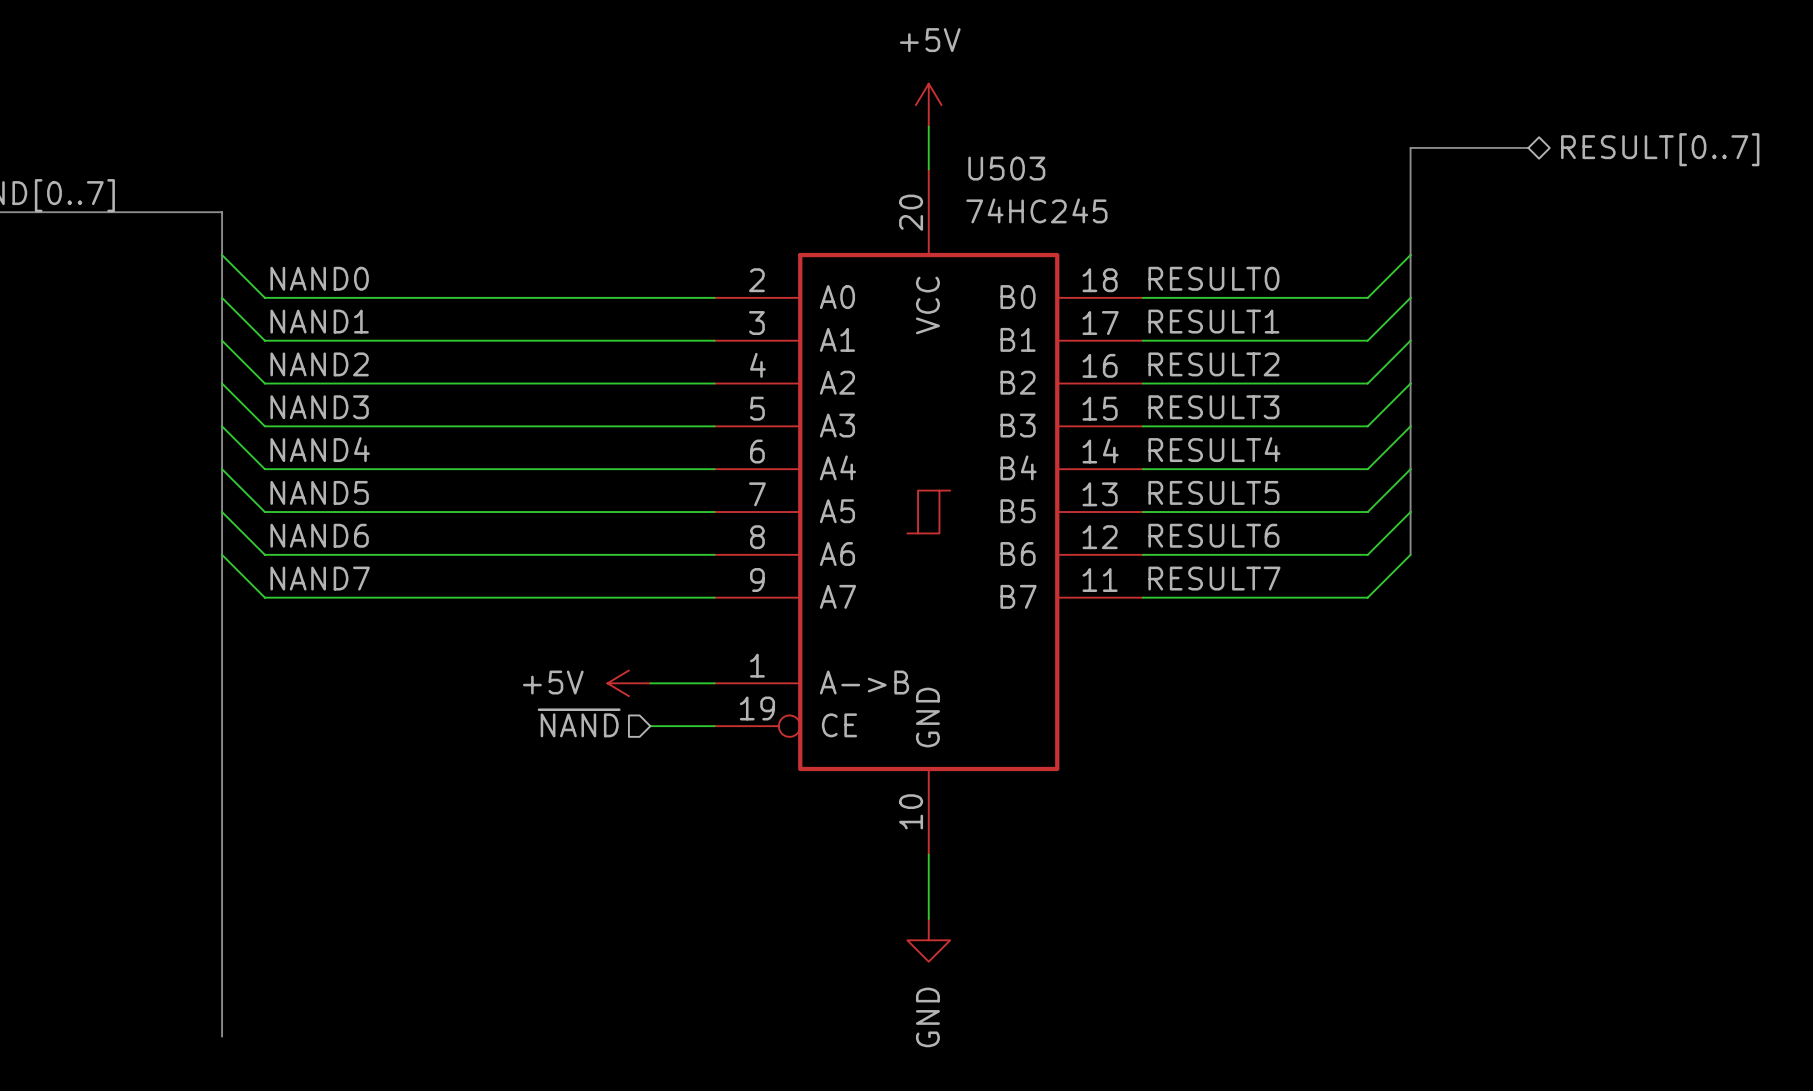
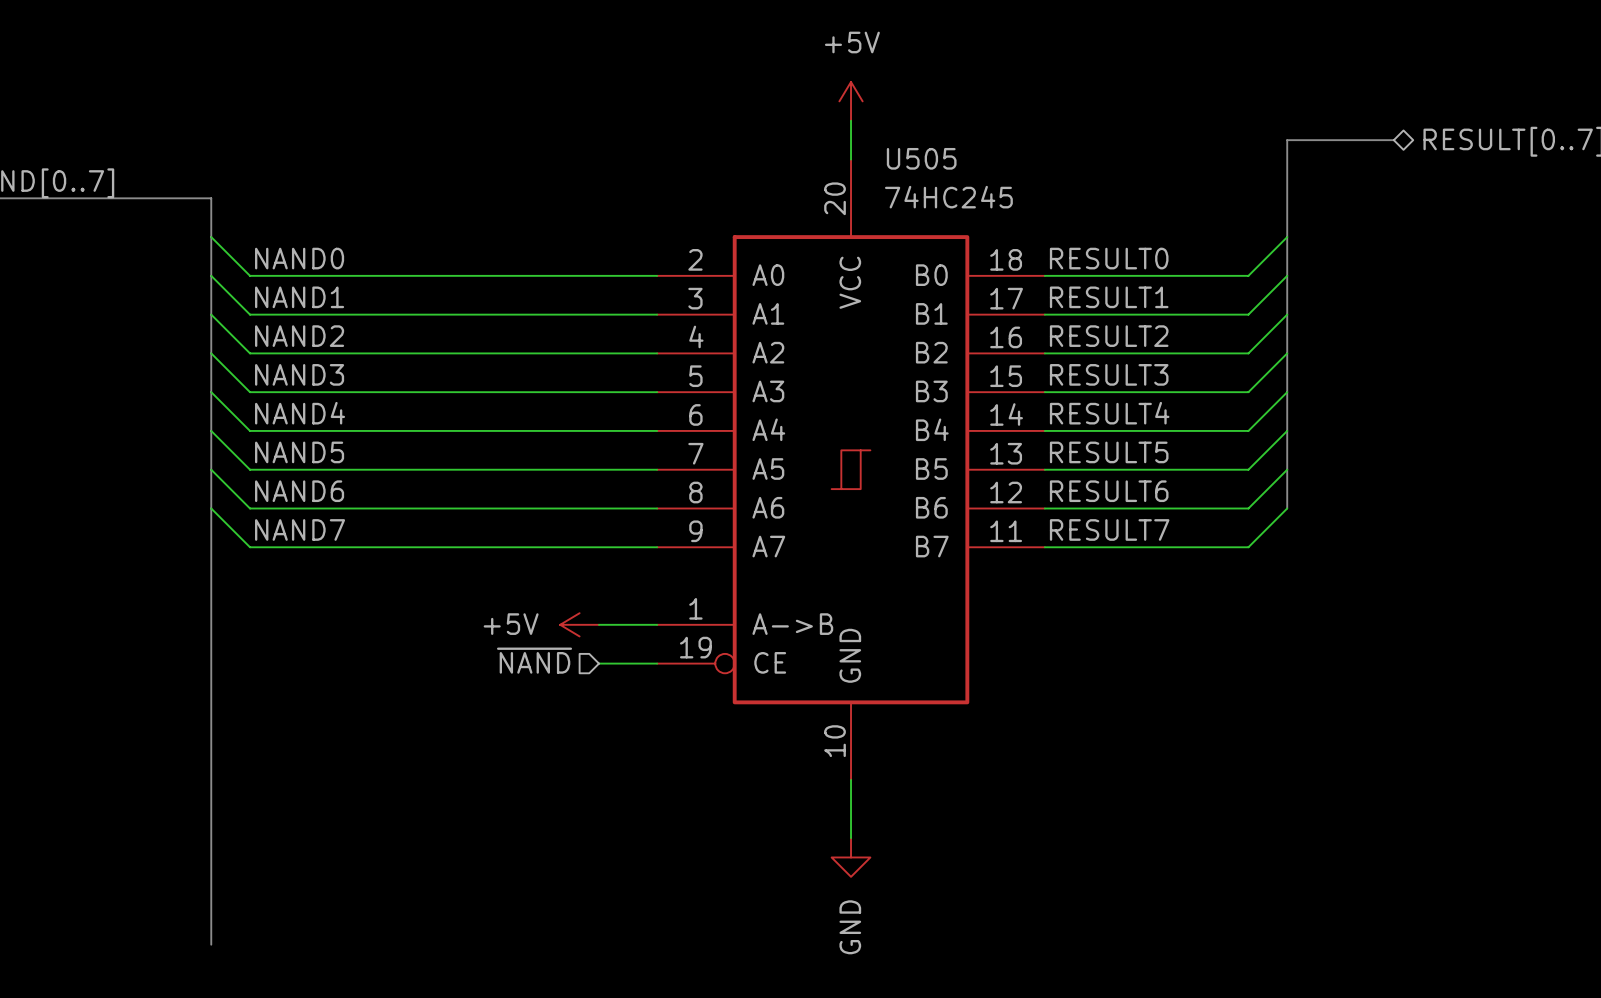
U503 name: U503 (1006, 168) -> U505 (921, 158)

